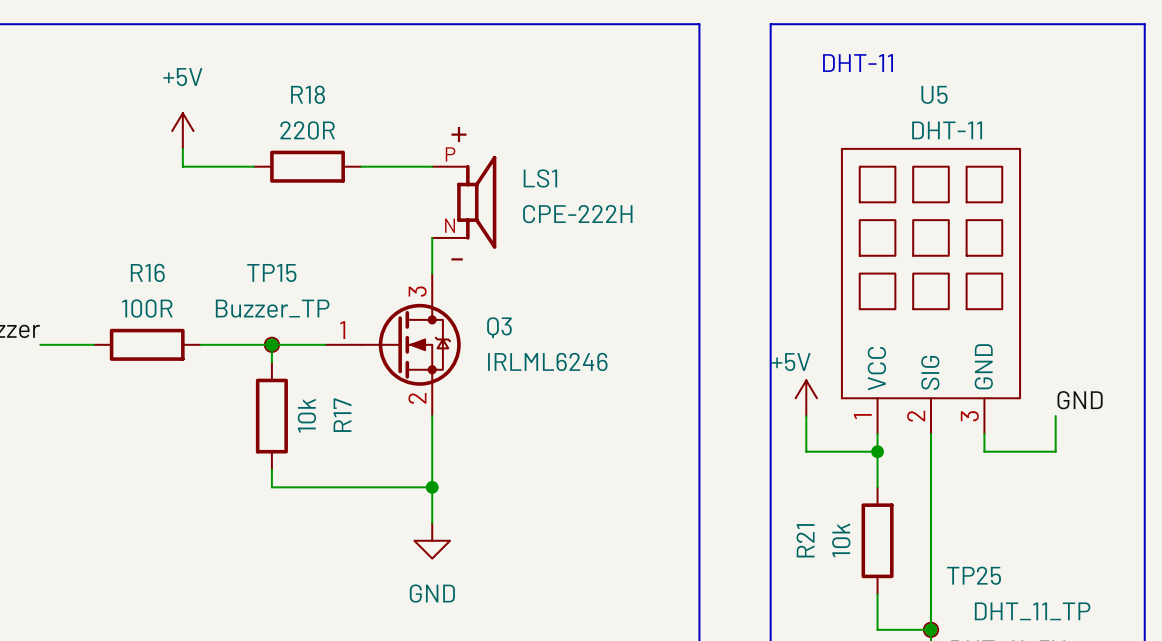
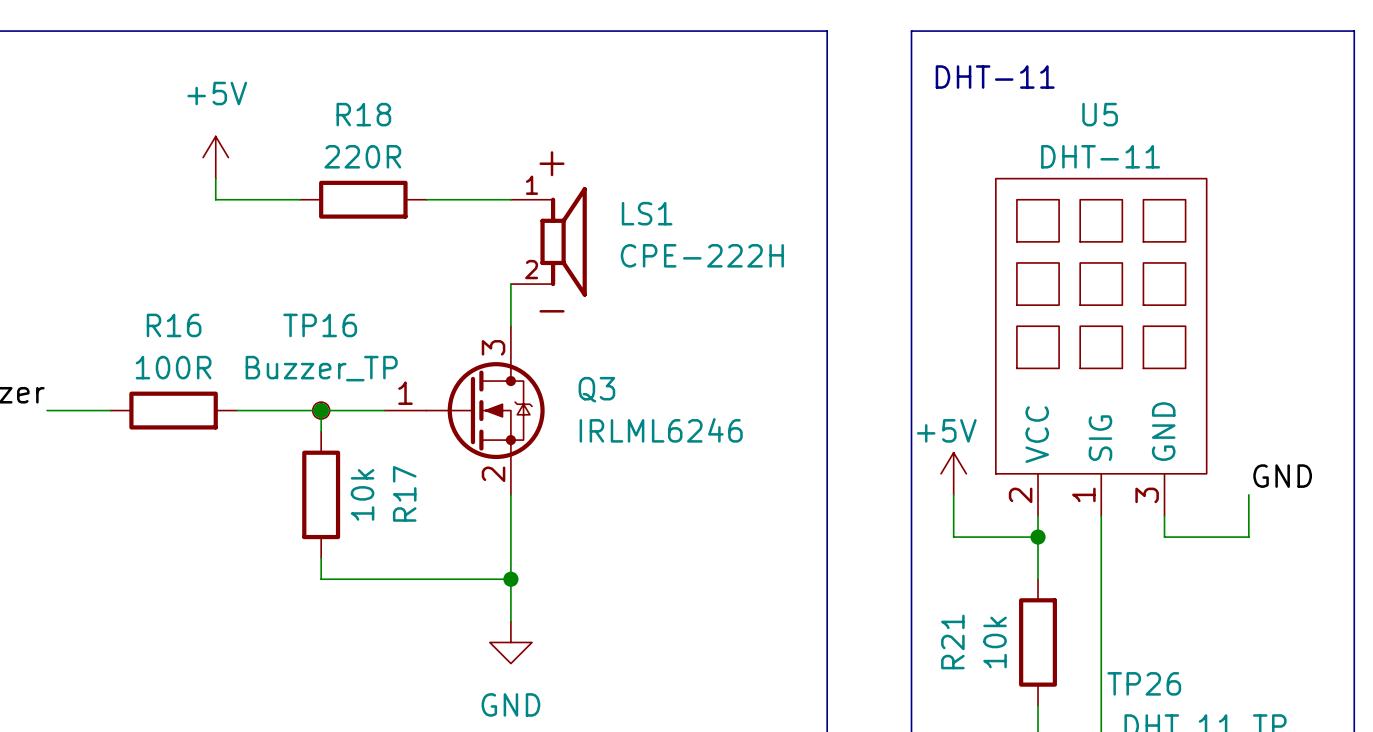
LS1 pin number: P (450, 154) -> 1 (532, 185)
LS1 pin number: N (450, 225) -> 2 (531, 269)
TP15 name: TP15 (271, 272) -> TP16 (320, 325)
U5 pin number: 1 (862, 416) -> 2 (1020, 495)
U5 pin number: 2 (916, 416) -> 1 (1083, 494)
TP25 name: TP25 (974, 575) -> TP26 (1144, 683)

